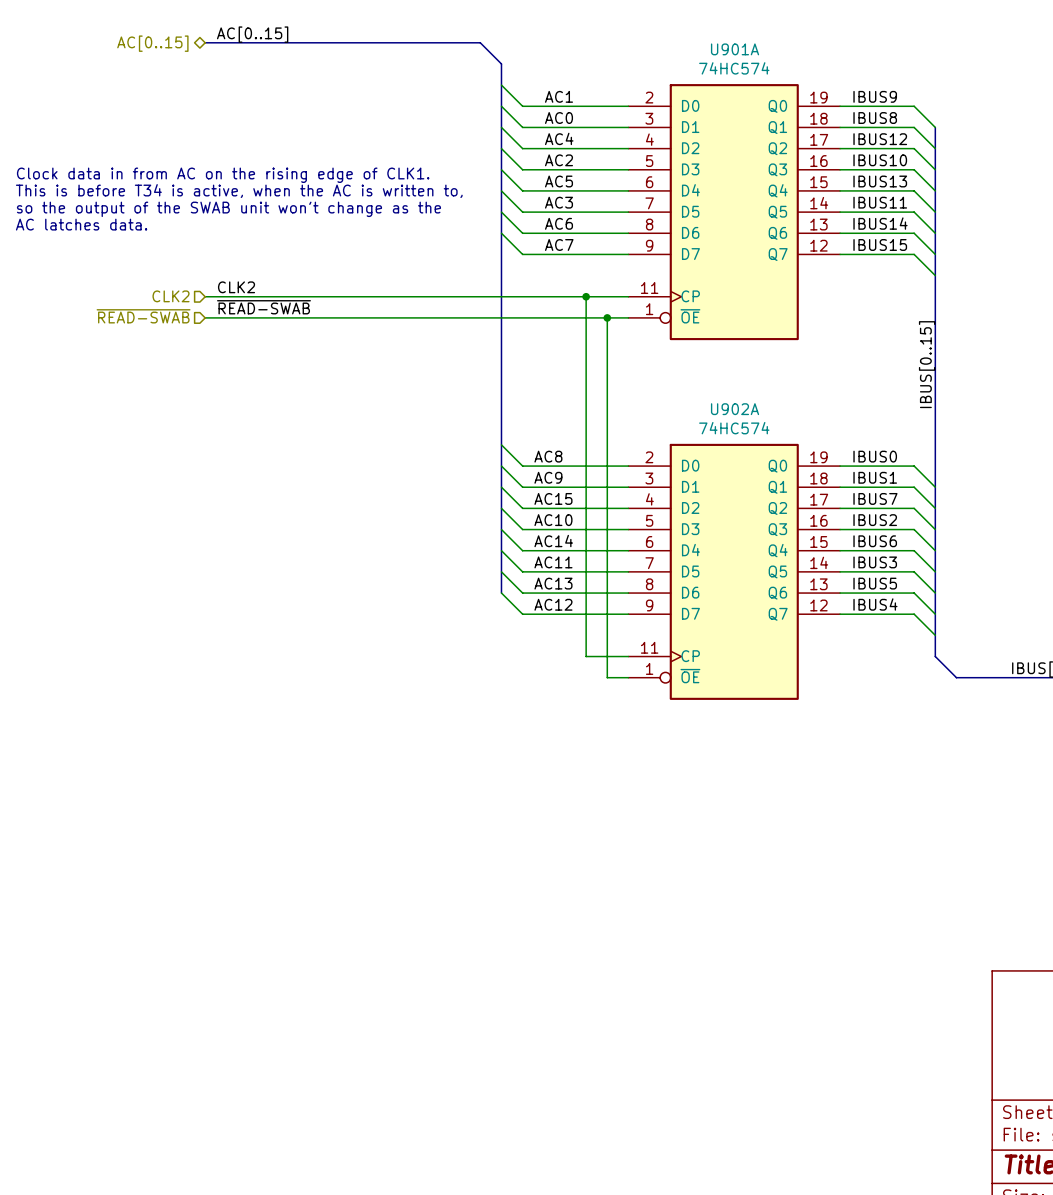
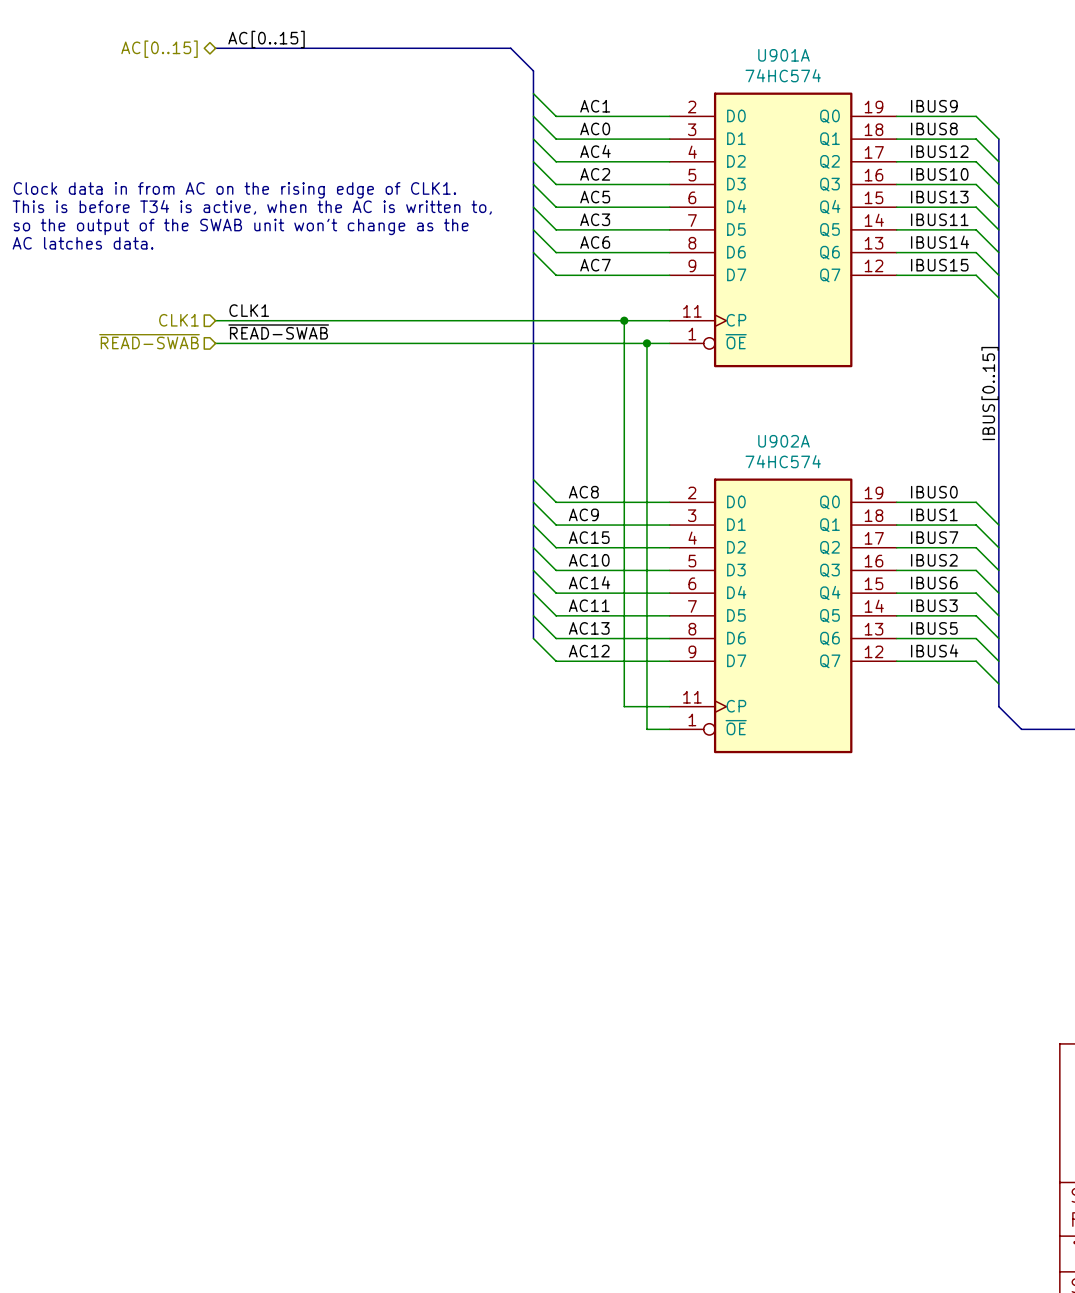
label: CLK2 (236, 287) -> CLK1 (249, 310)
hierarchical label: CLK2 (171, 296) -> CLK1 (178, 320)

